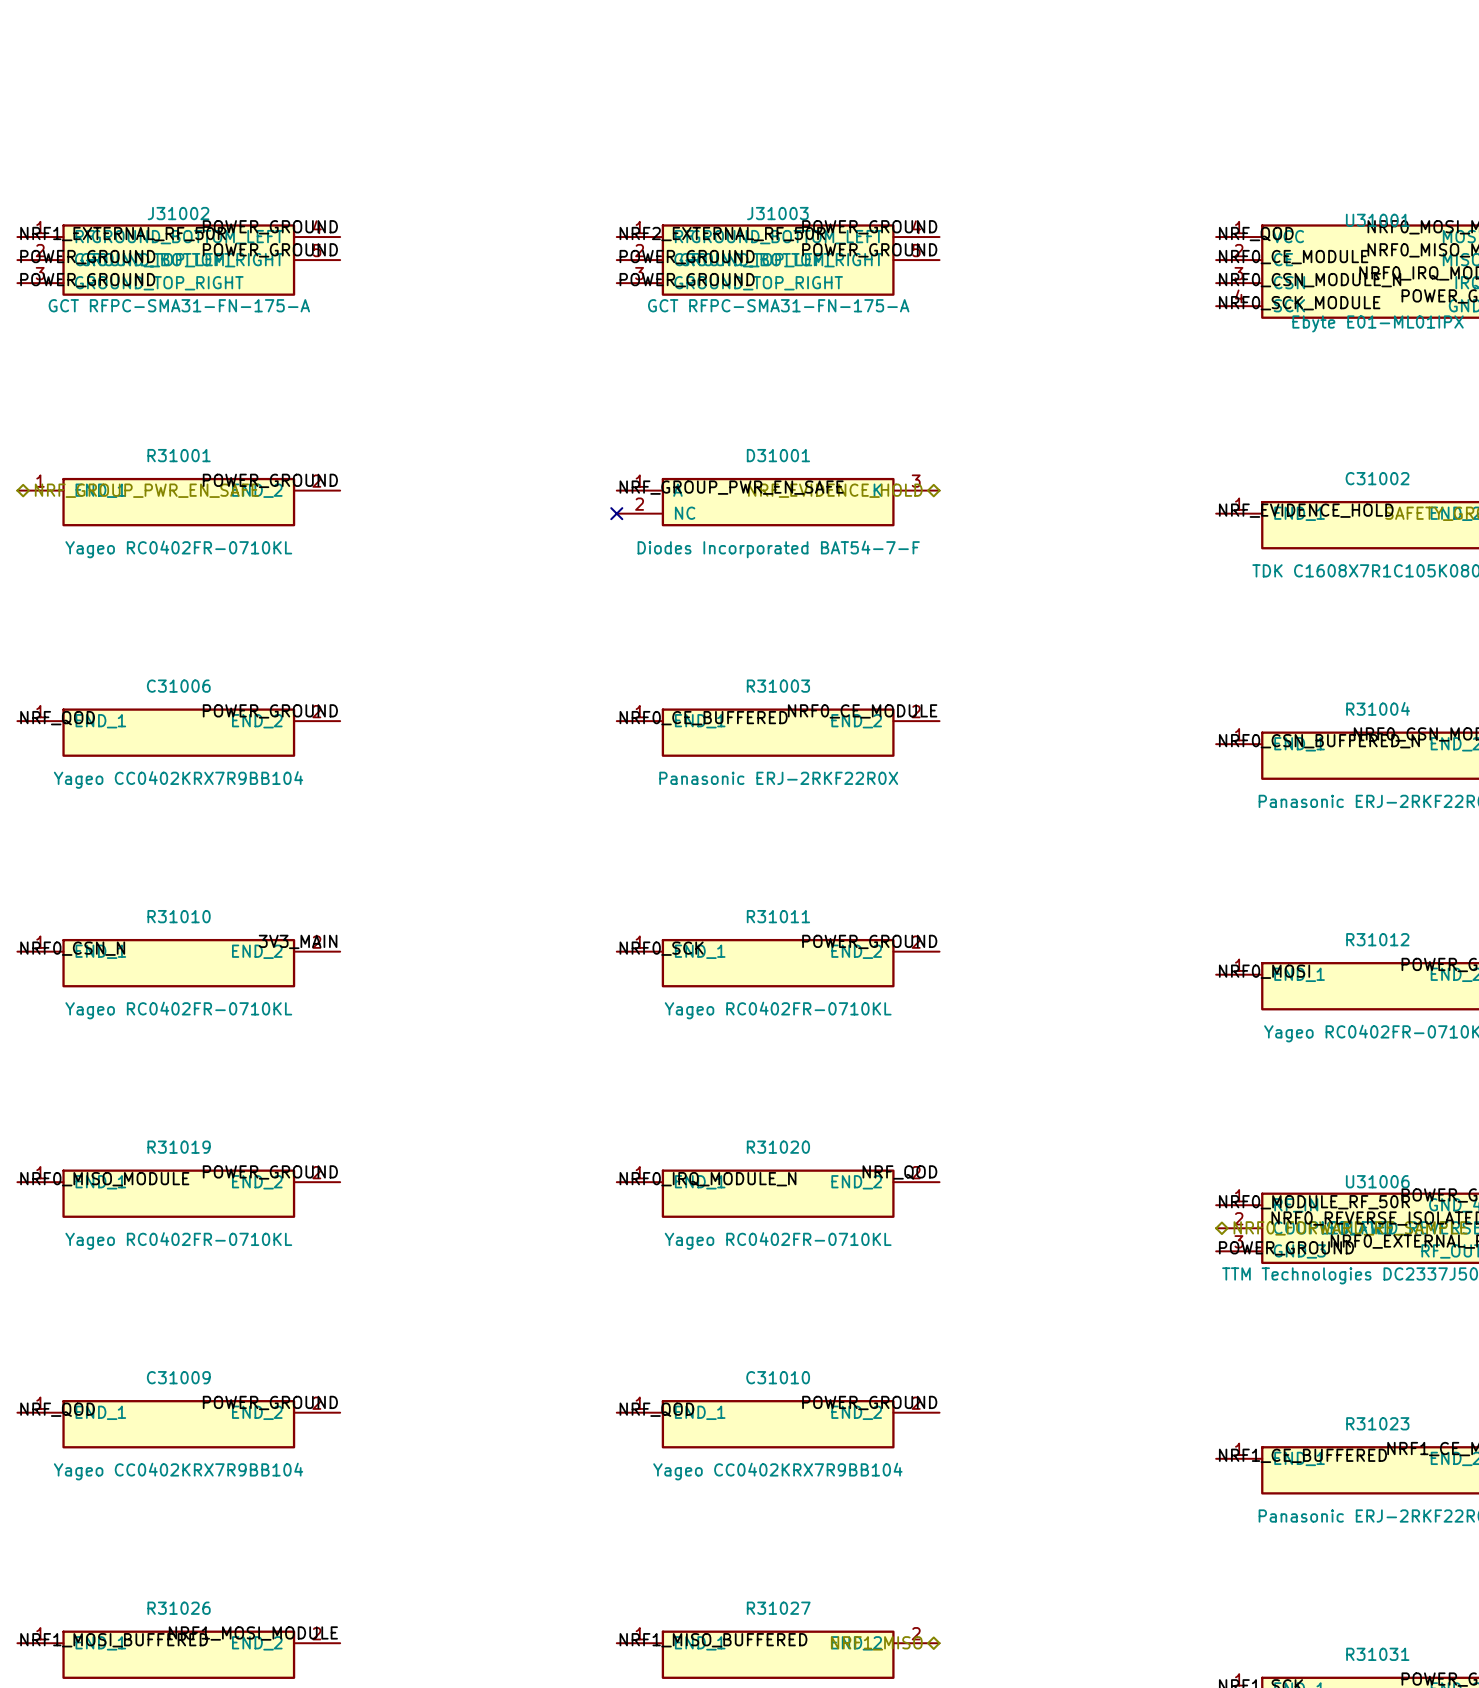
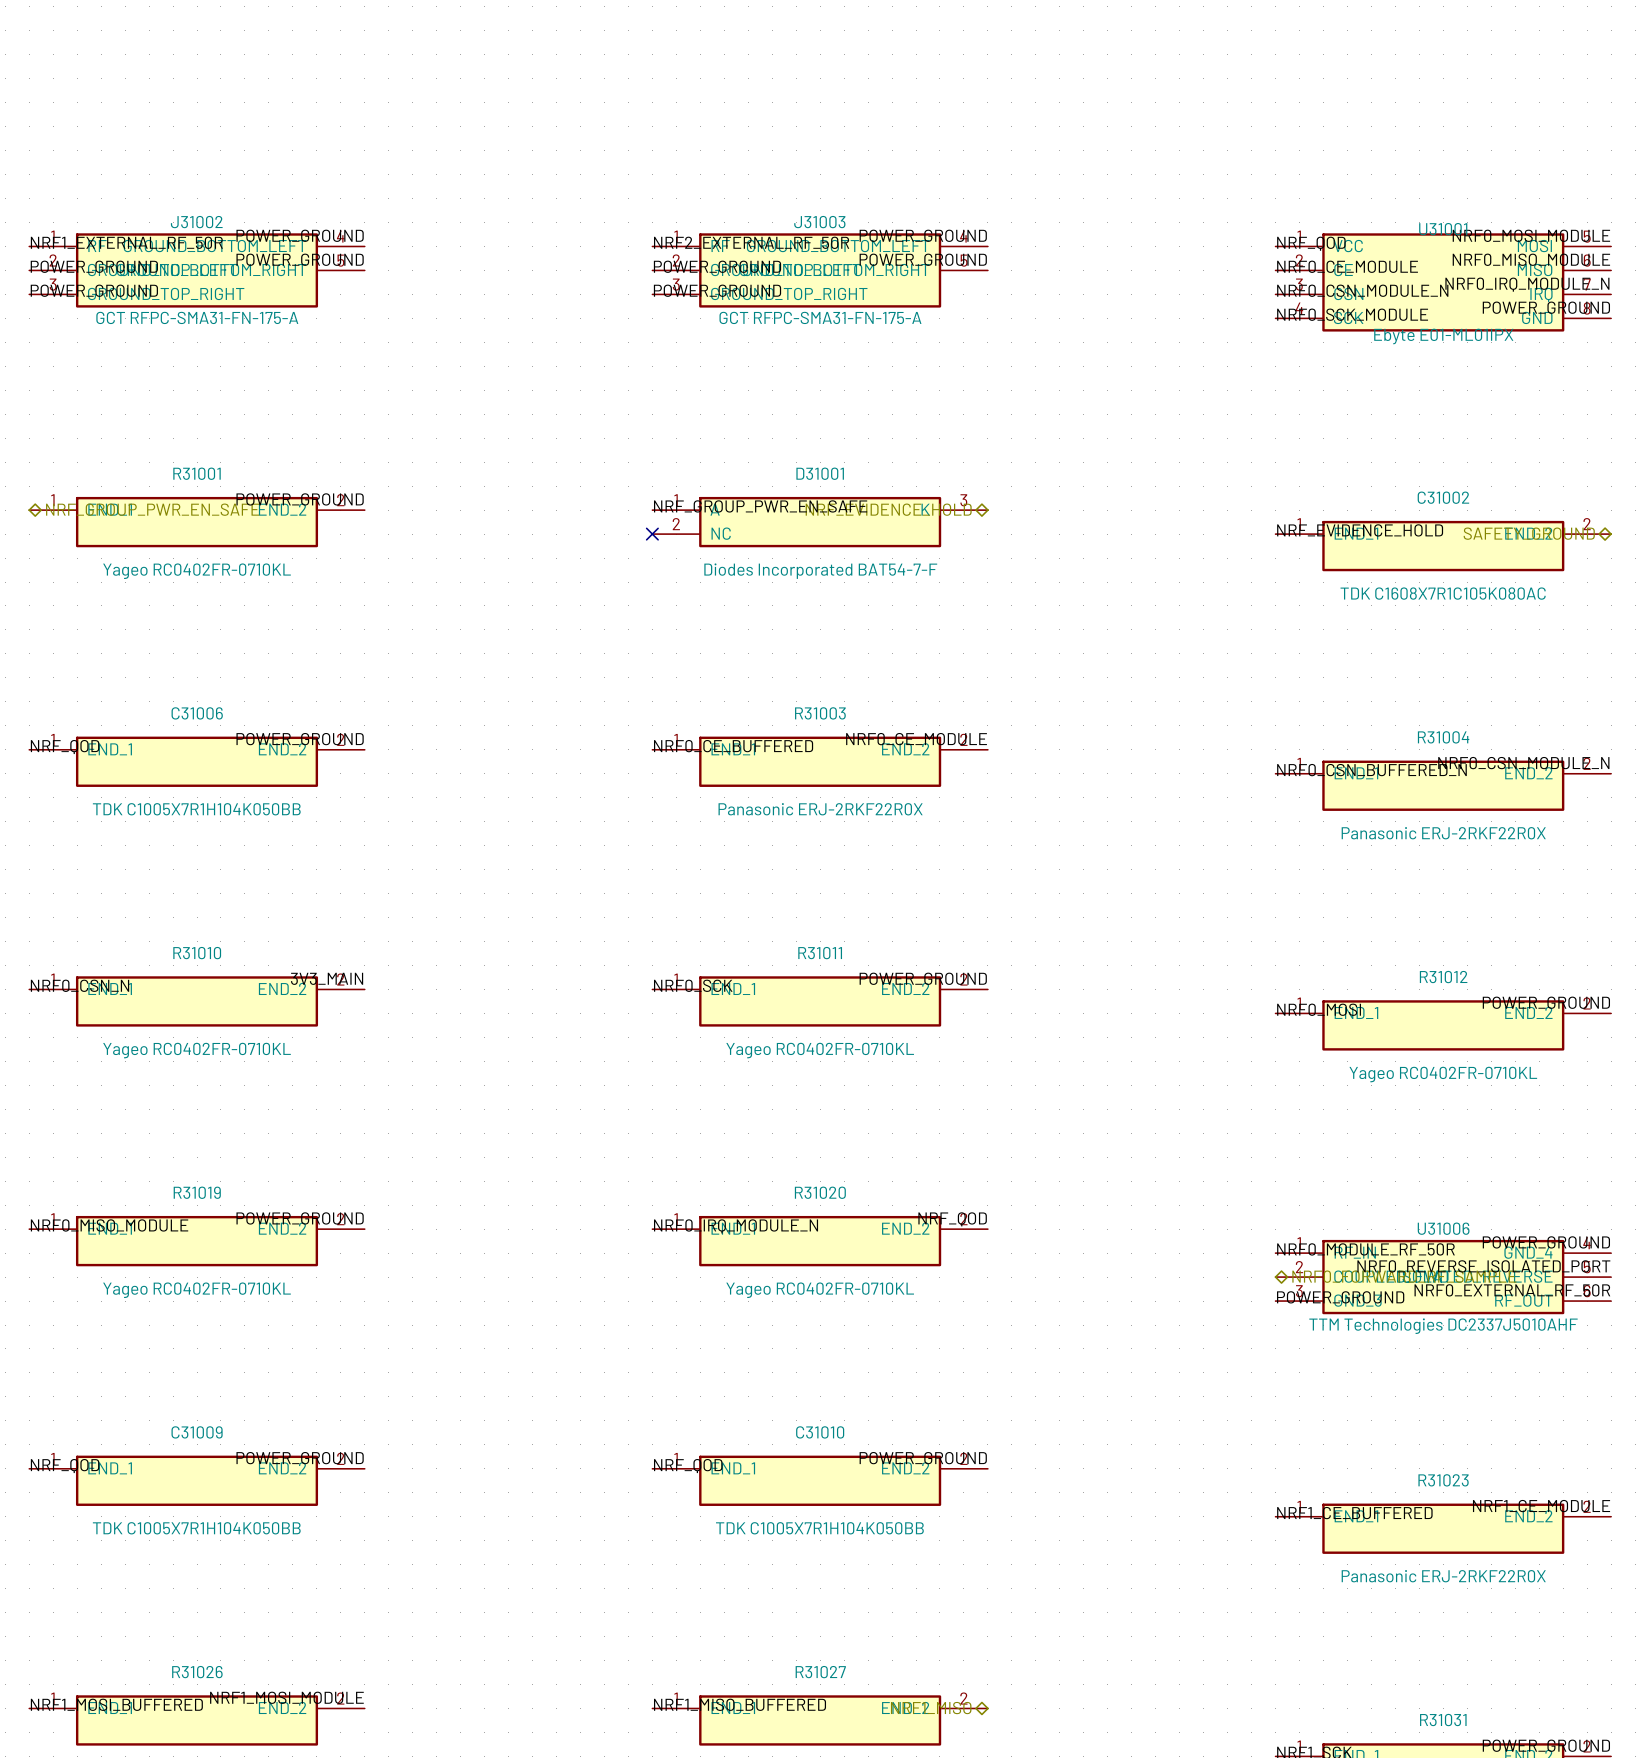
C31006 value: Yageo CC0402KRX7R9BB104 (178, 779) -> TDK C1005X7R1H104K050BB (196, 809)
C31009 value: Yageo CC0402KRX7R9BB104 (178, 1471) -> TDK C1005X7R1H104K050BB (196, 1528)
C31010 value: Yageo CC0402KRX7R9BB104 (777, 1471) -> TDK C1005X7R1H104K050BB (819, 1528)

